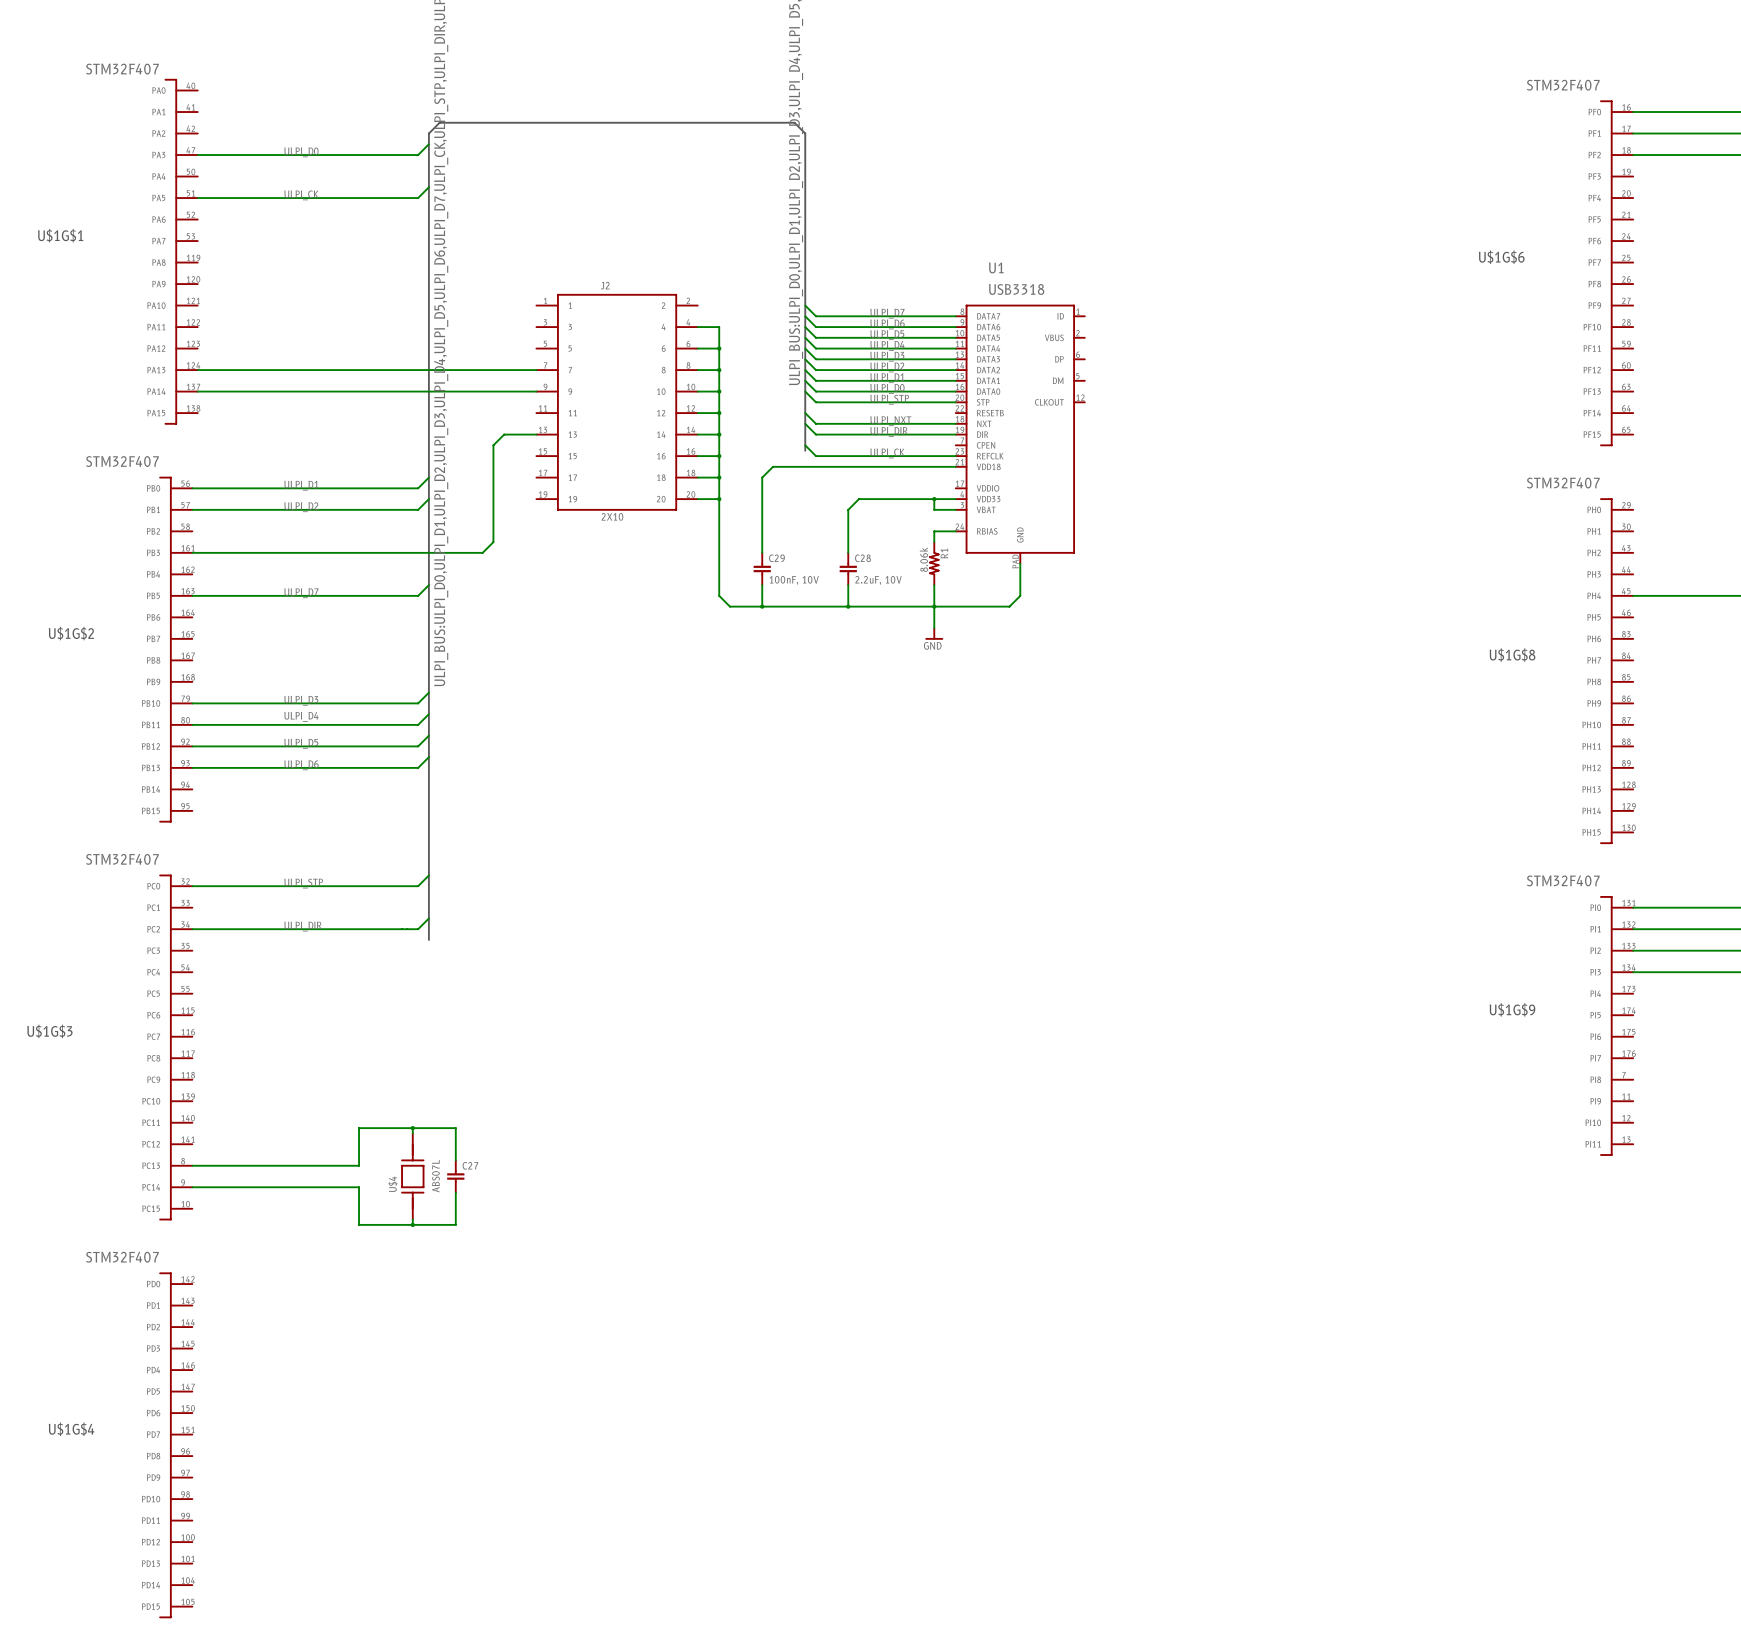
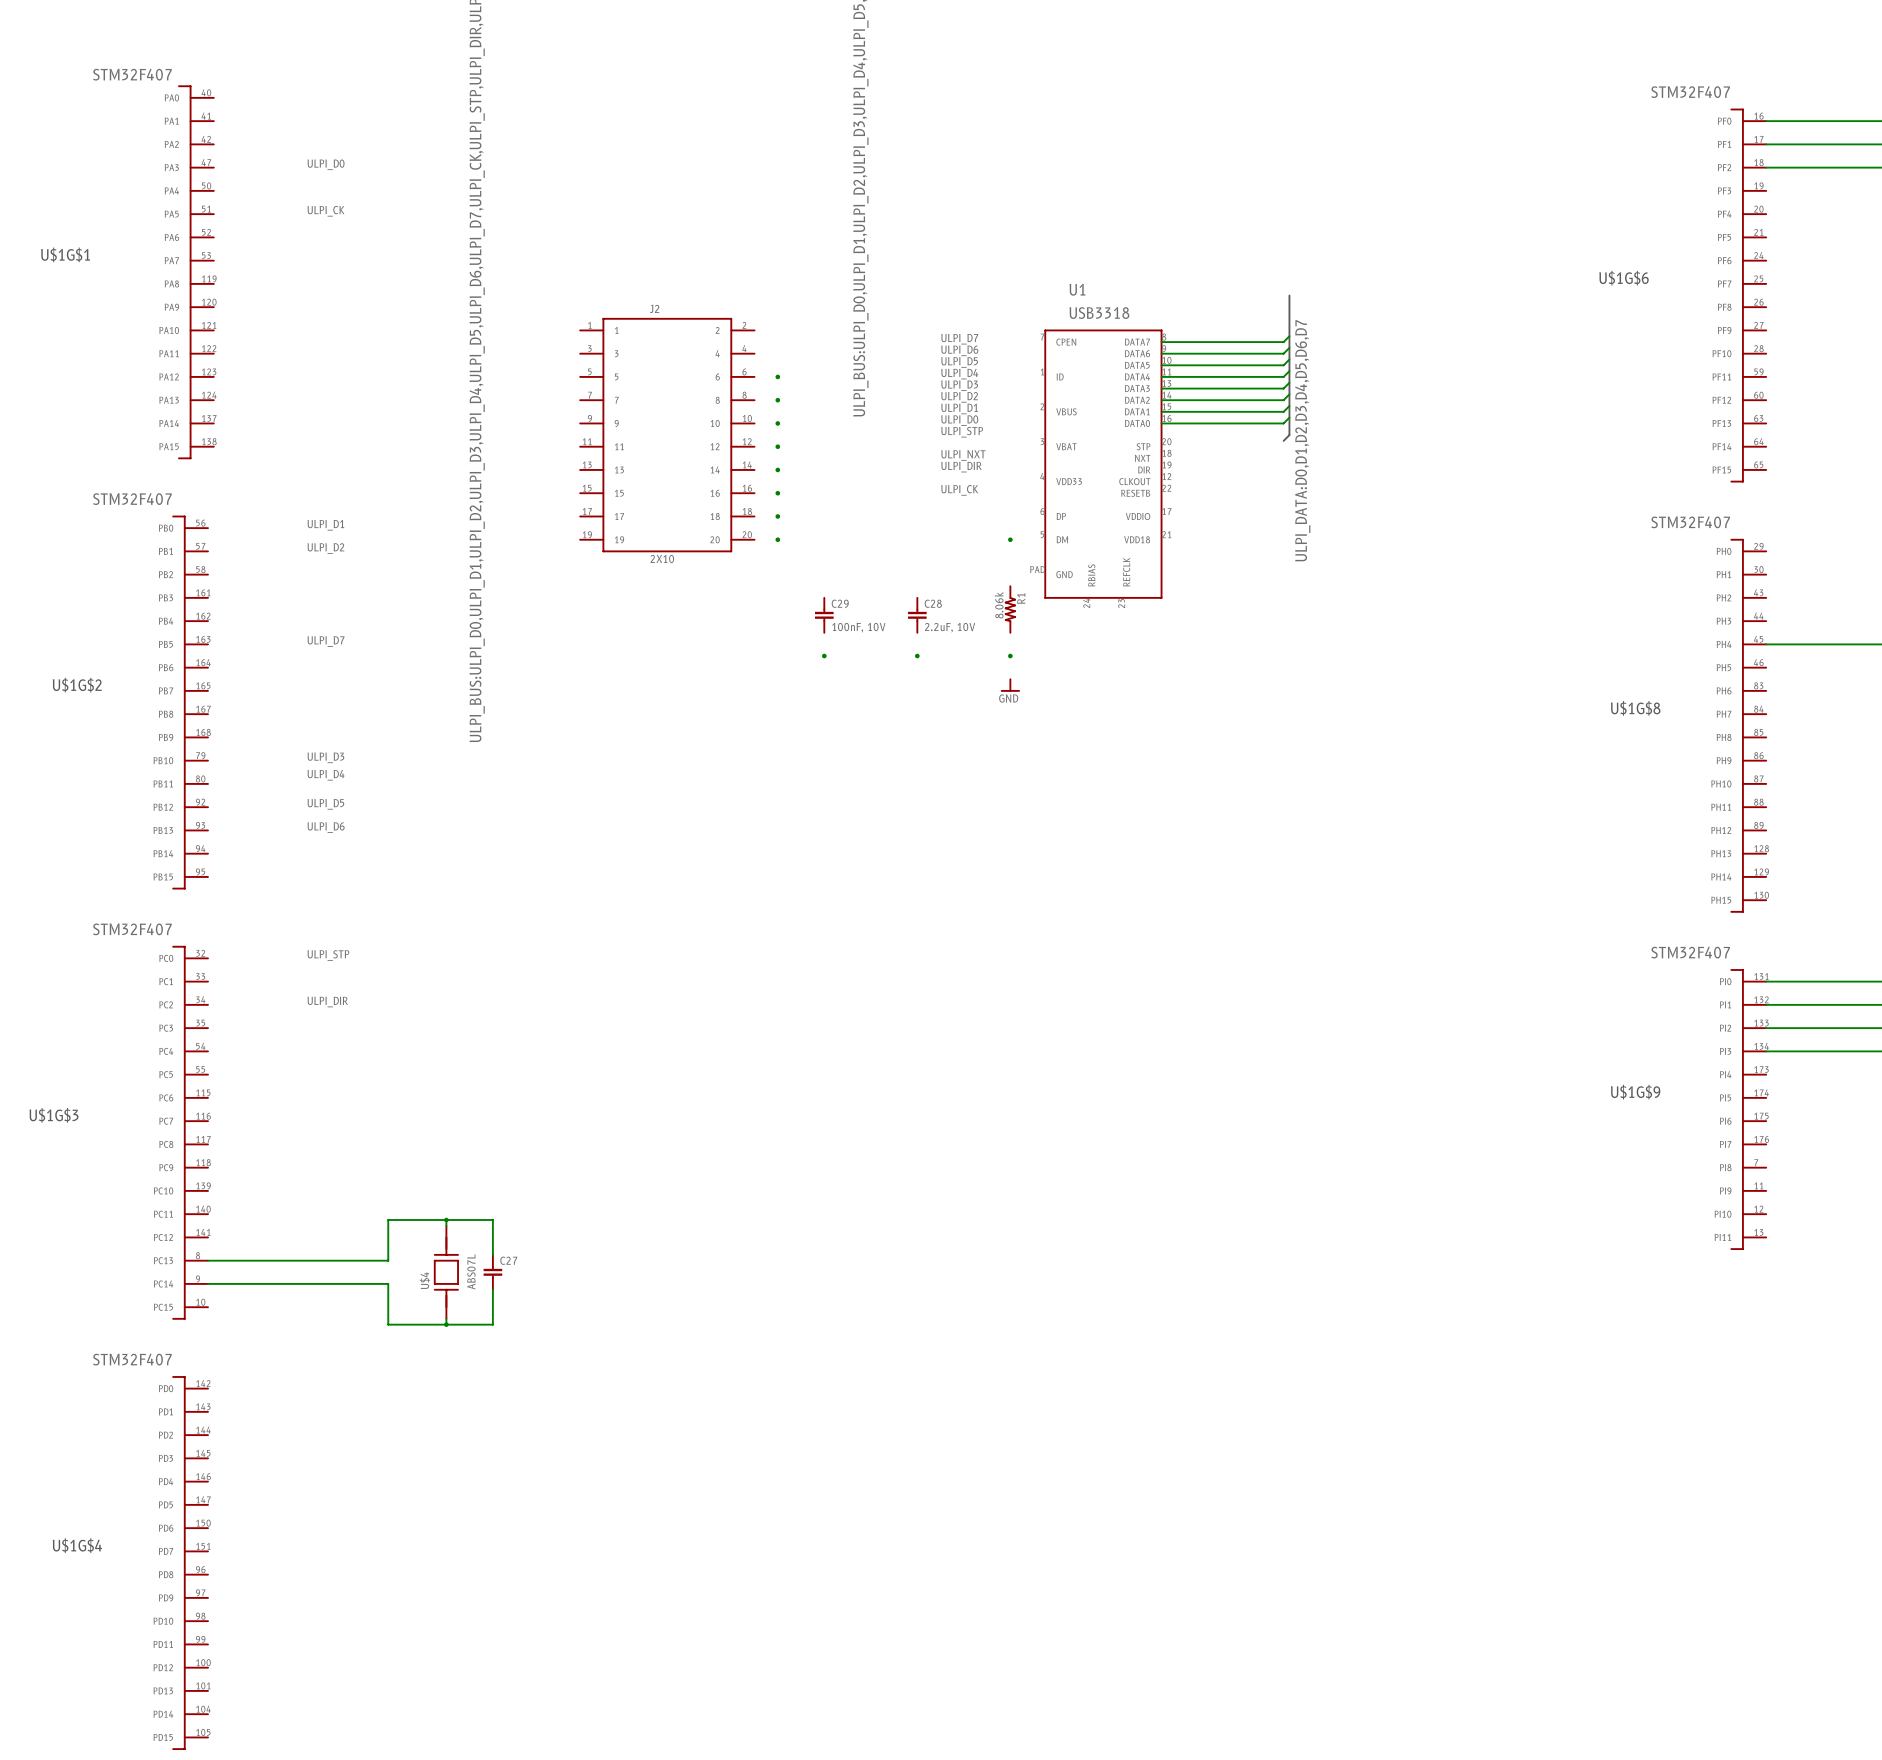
wire: (428, 144) (418, 155) (197, 155) -> none
wire: (428, 187) (418, 198) (197, 198) -> none
bus: none -> (1289, 295) (1289, 435) (1283, 440)
wire: (805, 305) (816, 316) (955, 316) -> none
U1 symbol: [955, 305, 1085, 564] -> [1044, 329, 1163, 599]
wire: none -> (1289, 336) (1283, 342) (1161, 342)
wire: (805, 316) (816, 327) (955, 327) -> none
wire: none -> (1289, 347) (1283, 353) (1161, 353)
wire: (697, 327) (719, 327) (719, 595) (729, 606) (1009, 606) (1020, 595) (1020, 563) -> none
wire: (805, 327) (816, 337) (955, 337) -> none
wire: none -> (1289, 359) (1283, 365) (1161, 365)
wire: (805, 337) (816, 348) (955, 348) -> none
wire: none -> (1289, 371) (1283, 376) (1161, 376)
wire: (697, 348) (719, 348) -> none
wire: (805, 348) (816, 359) (955, 359) -> none
wire: none -> (1289, 382) (1283, 388) (1161, 388)
wire: (805, 359) (816, 370) (955, 370) -> none
wire: none -> (1289, 394) (1283, 400) (1161, 400)
wire: (197, 370) (536, 370) -> none
wire: (697, 370) (719, 370) -> none
wire: (805, 370) (816, 380) (955, 380) -> none
wire: none -> (1289, 406) (1283, 411) (1161, 411)
wire: (805, 380) (816, 391) (955, 391) -> none
wire: none -> (1289, 417) (1283, 423) (1161, 423)
wire: (197, 391) (536, 391) -> none
wire: (697, 391) (719, 391) -> none
wire: (805, 391) (816, 402) (955, 402) -> none
label: none -> ULPI_DATA:D0,D1,D2,D3,D4,D5,D6,D7 (1302, 440)
wire: (697, 413) (719, 413) -> none
wire: (805, 413) (816, 423) (955, 423) -> none
wire: (805, 423) (816, 434) (955, 434) -> none
wire: (536, 434) (504, 434) (493, 445) (493, 542) (482, 552) (192, 552) -> none
wire: (697, 434) (719, 434) -> none
wire: (805, 445) (816, 456) (955, 456) -> none
bus: (805, 450) (805, 133) (794, 122) (439, 122) (428, 133) (428, 939) -> none
wire: (697, 456) (719, 456) -> none
wire: (955, 466) (772, 466) (762, 477) (762, 552) -> none
wire: (428, 477) (418, 488) (192, 488) -> none
wire: (697, 477) (719, 477) -> none
wire: (428, 499) (418, 509) (192, 509) -> none
wire: (697, 499) (719, 499) -> none
wire: (934, 499) (934, 509) (955, 509) -> none
wire: (955, 499) (859, 499) (848, 509) (848, 552) -> none
wire: (955, 531) (934, 531) (934, 542) -> none
wire: (428, 585) (418, 595) (192, 595) -> none
wire: (762, 585) (762, 606) -> none
wire: (848, 585) (848, 606) -> none
wire: (934, 585) (934, 628) -> none
wire: (428, 692) (418, 703) (192, 703) -> none
wire: (428, 714) (418, 724) (192, 724) -> none
wire: (428, 735) (418, 746) (192, 746) -> none
wire: (428, 757) (418, 767) (192, 767) -> none
wire: (428, 875) (418, 886) (192, 886) -> none
wire: (428, 918) (418, 929) (192, 929) -> none

